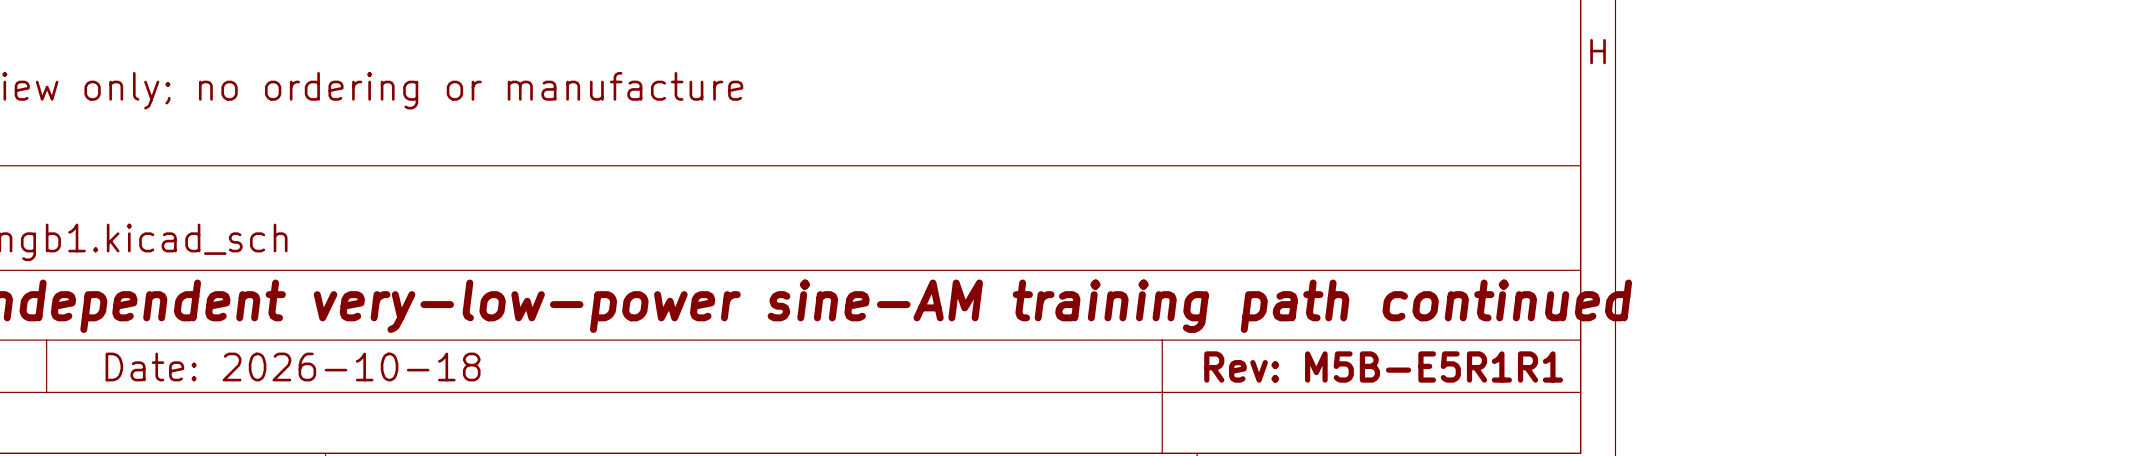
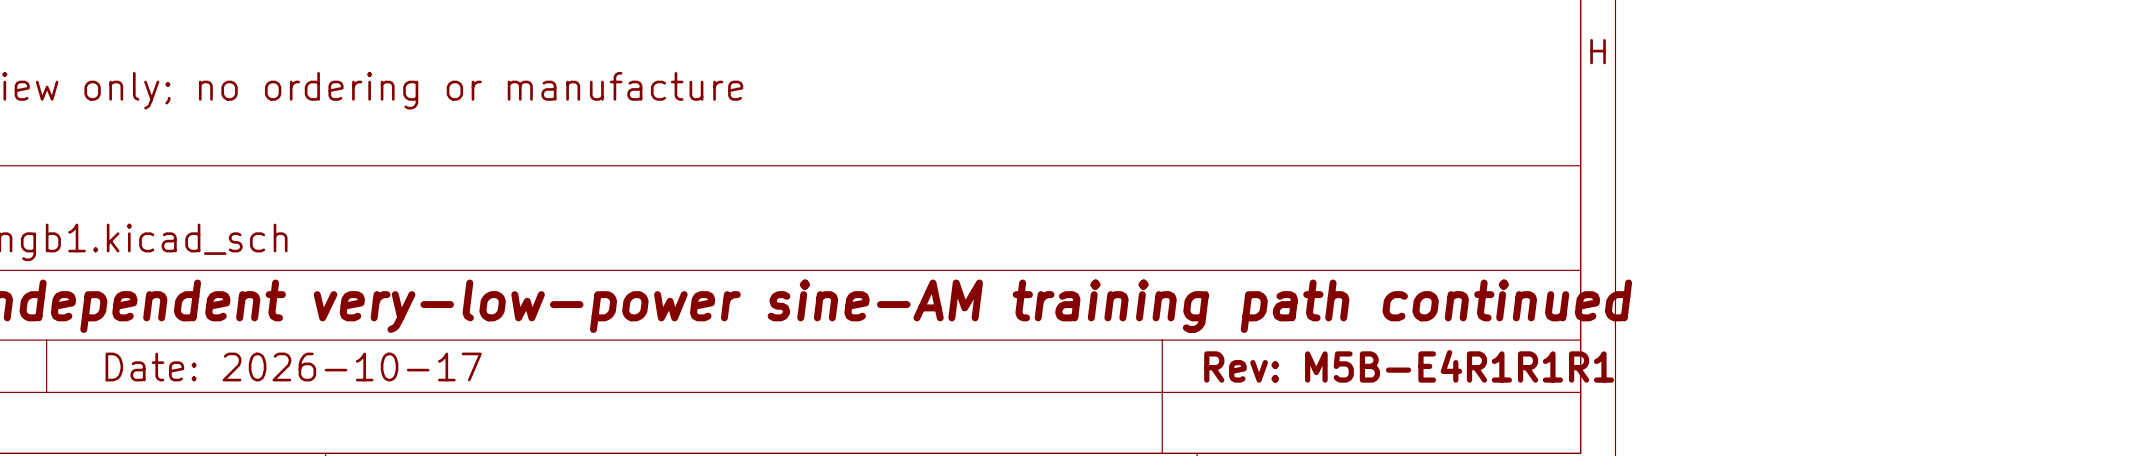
title block: Date: 2026-10-18 (293, 367) -> Date: 2026-10-17 (293, 367)
title block: Rev: M5B-E5R1R1 (1383, 367) -> Rev: M5B-E4R1R1R1 (1409, 366)

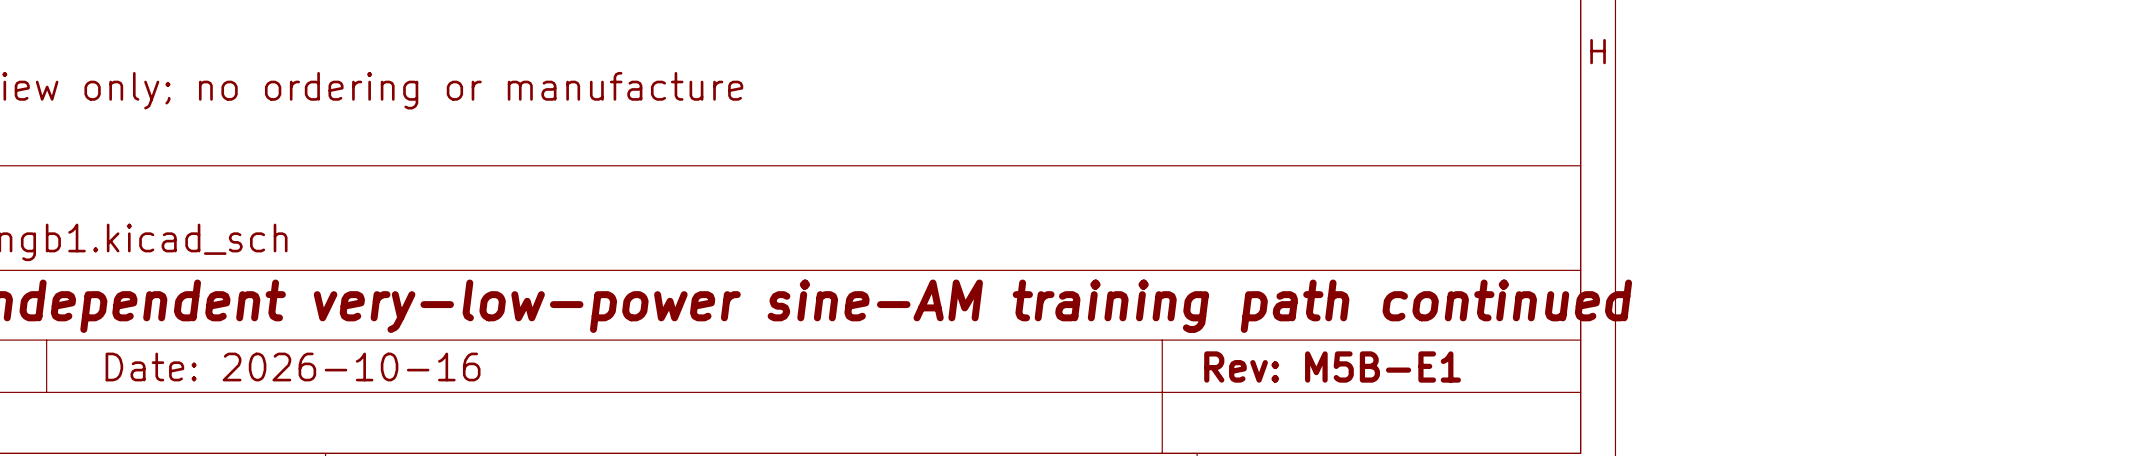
title block: Rev: M5B-E4R1R1R1 (1409, 366) -> Rev: M5B-E1 (1332, 367)
title block: Date: 2026-10-17 (293, 367) -> Date: 2026-10-16 (293, 367)

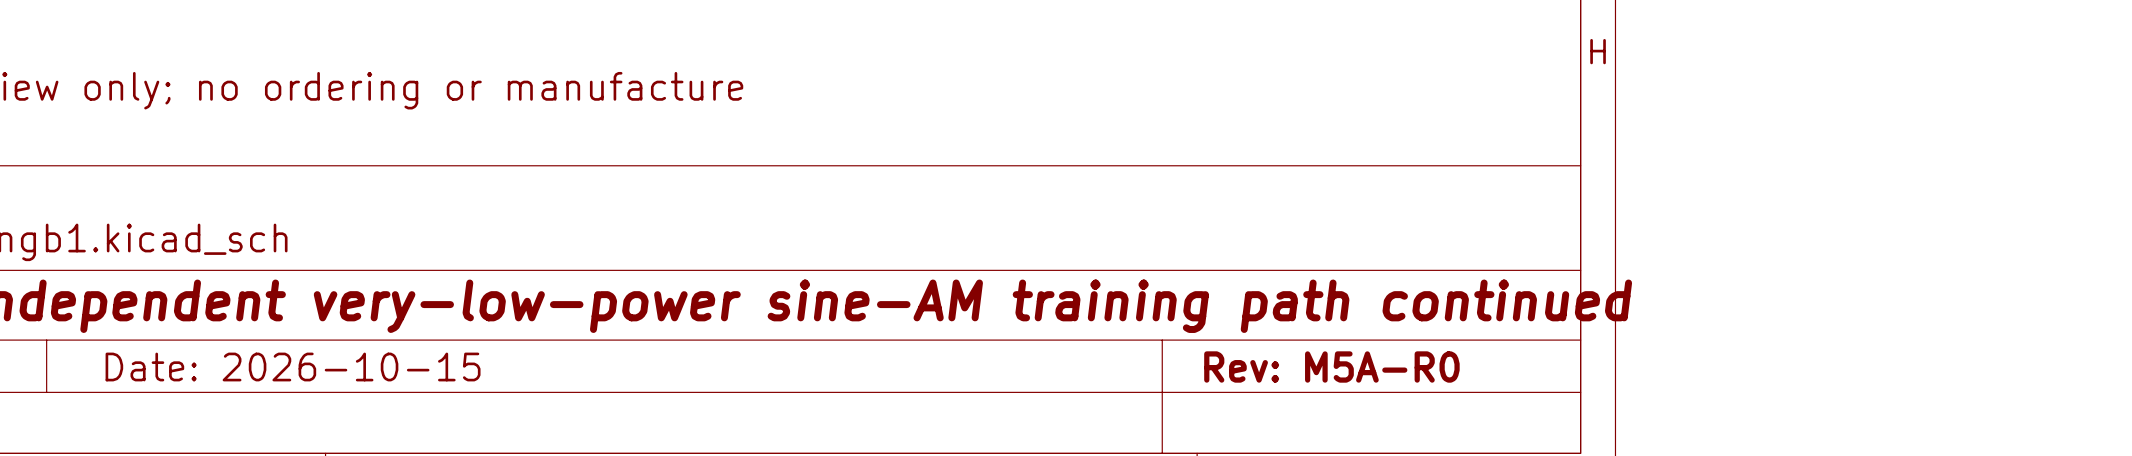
title block: Date: 2026-10-16 (293, 367) -> Date: 2026-10-15 (293, 367)
title block: Rev: M5B-E1 (1332, 367) -> Rev: M5A-R0 (1331, 367)

